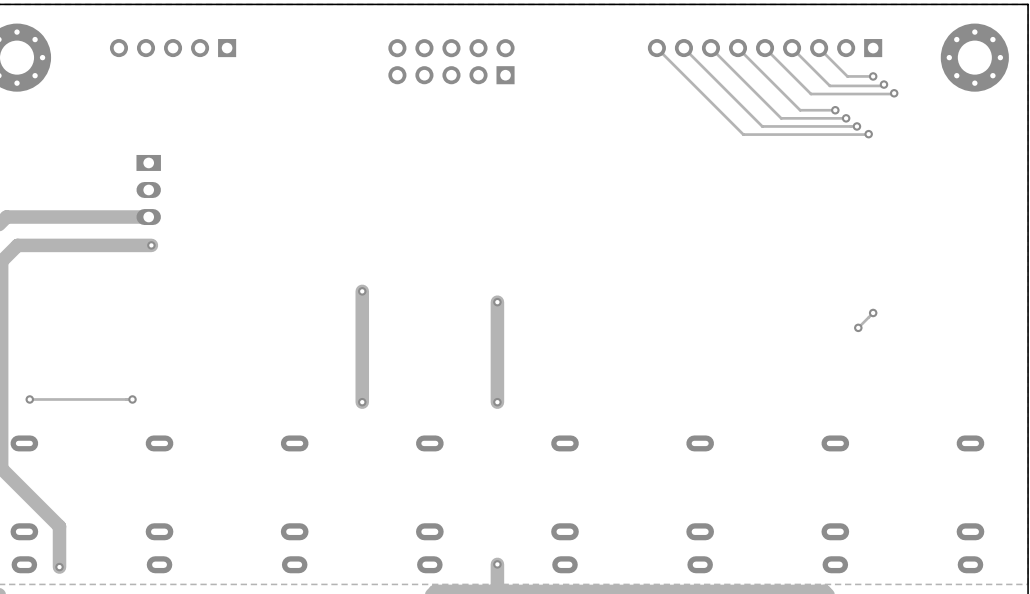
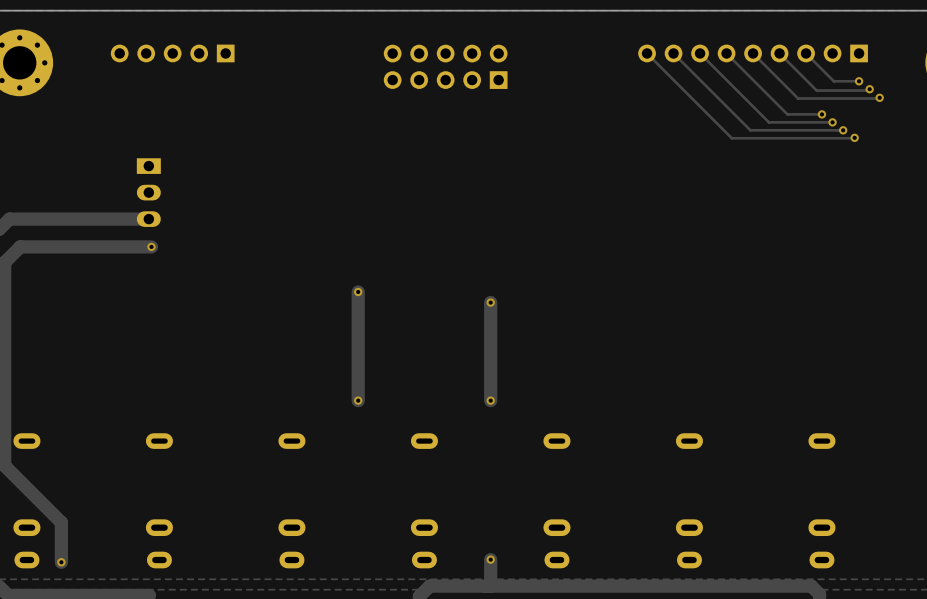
track: (873, 312) (858, 327) -> none
via: (873, 312) -> none
via: (858, 327) -> none
via: (29, 399) -> none
track: (132, 399) (29, 399) -> none
via: (132, 399) -> none

